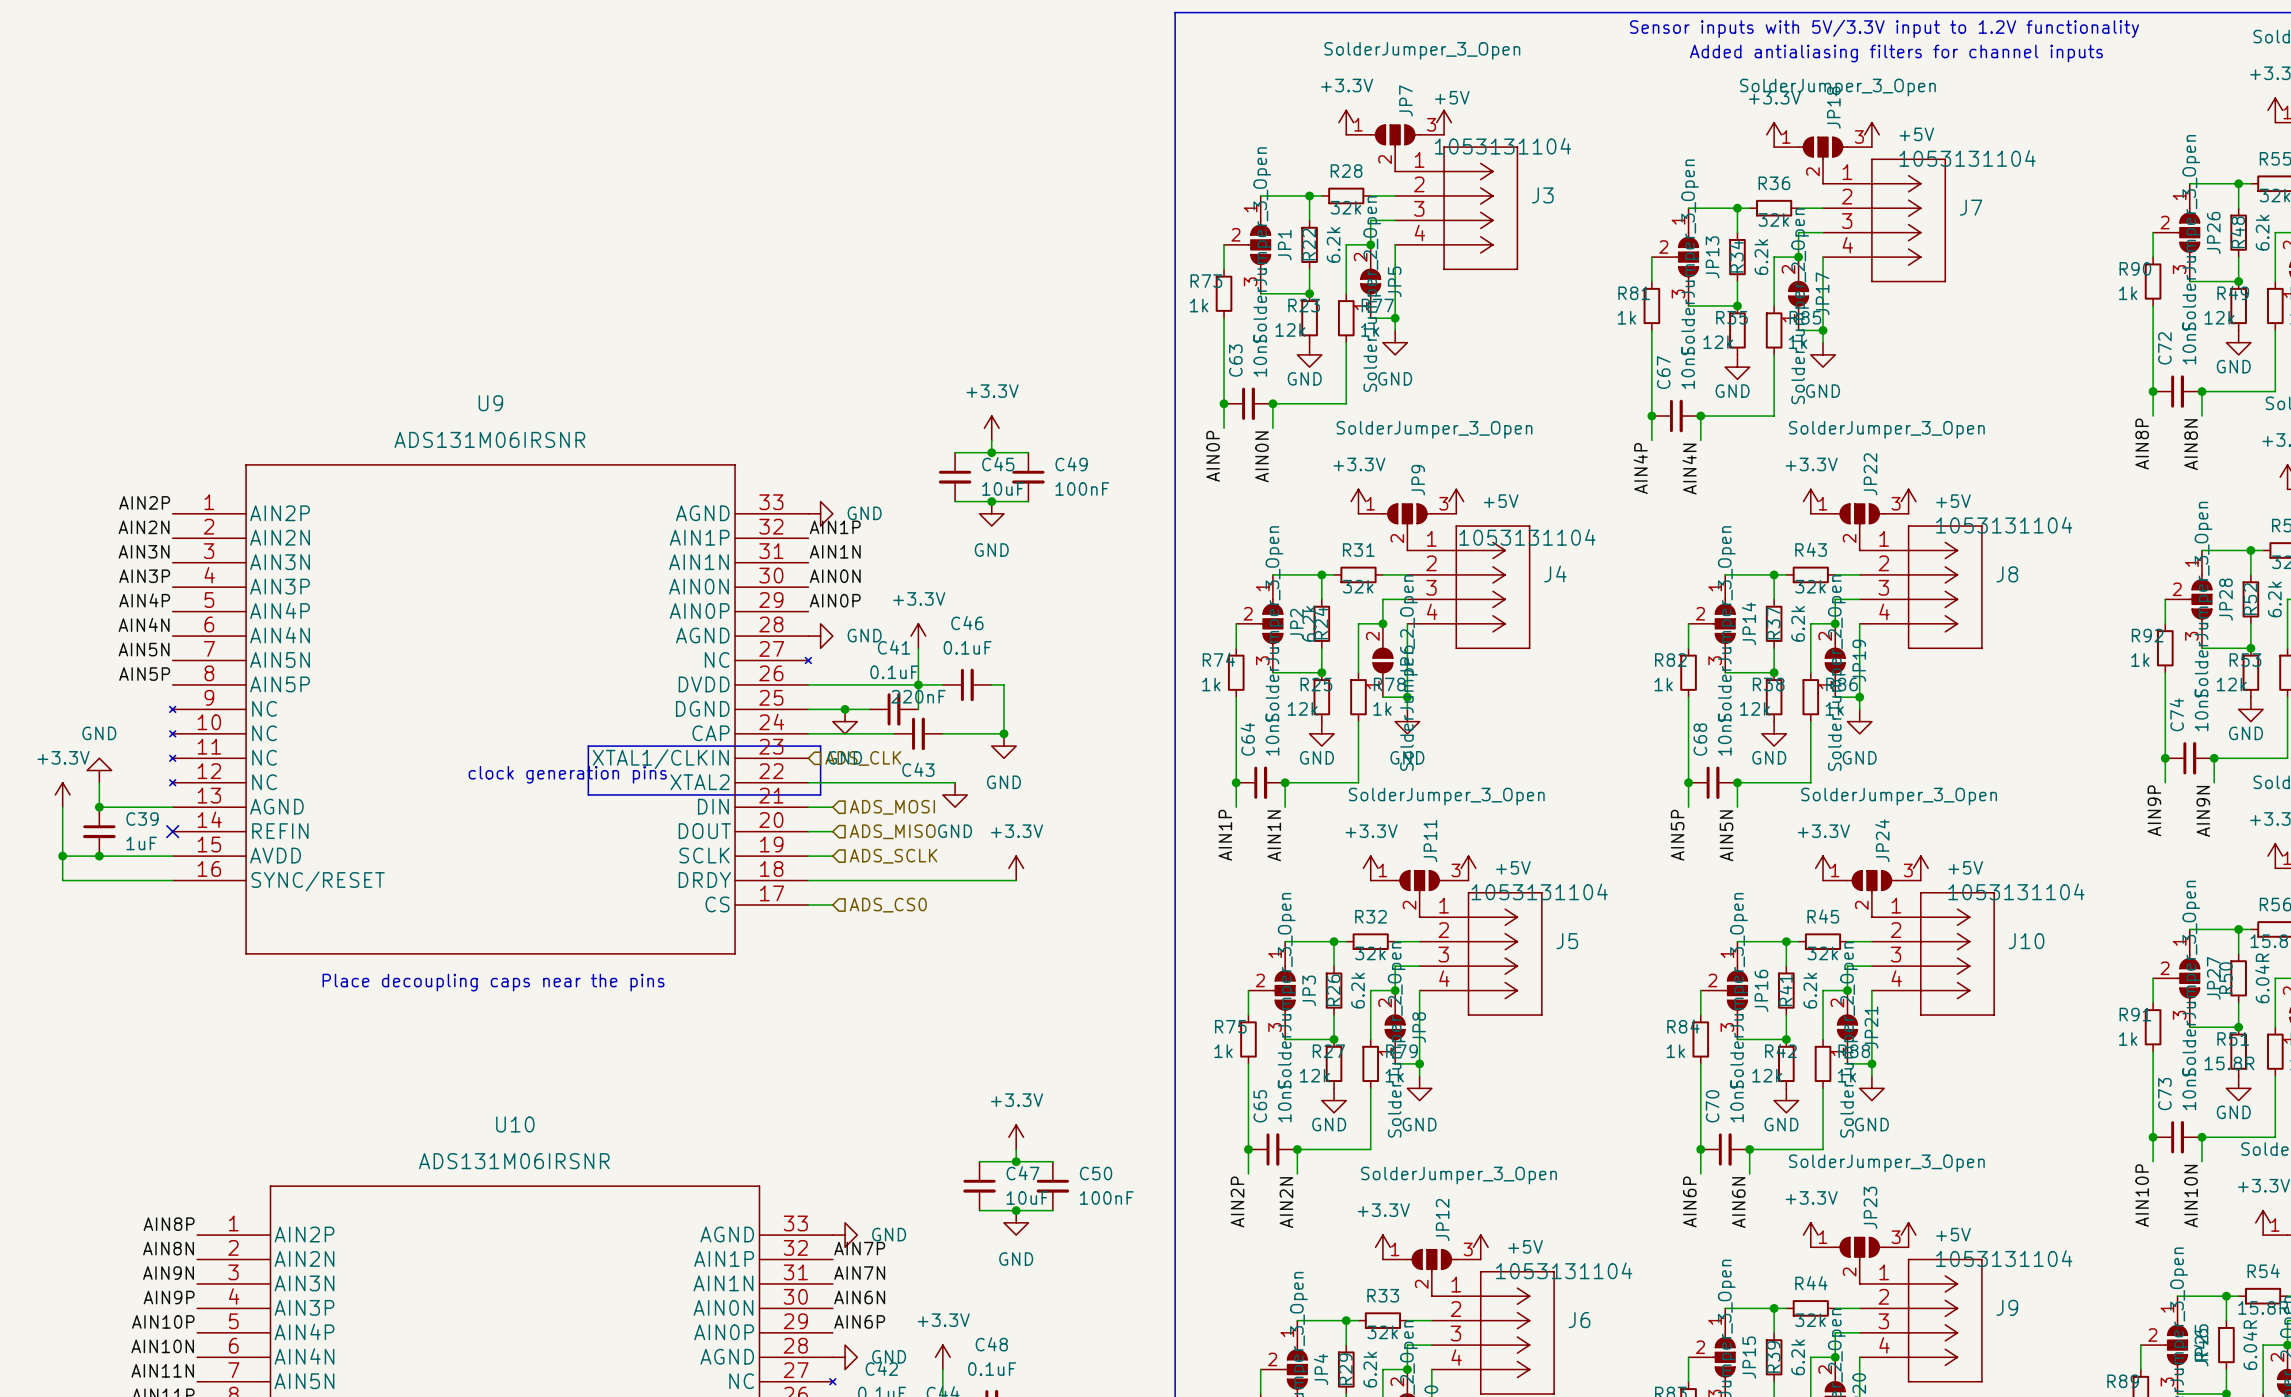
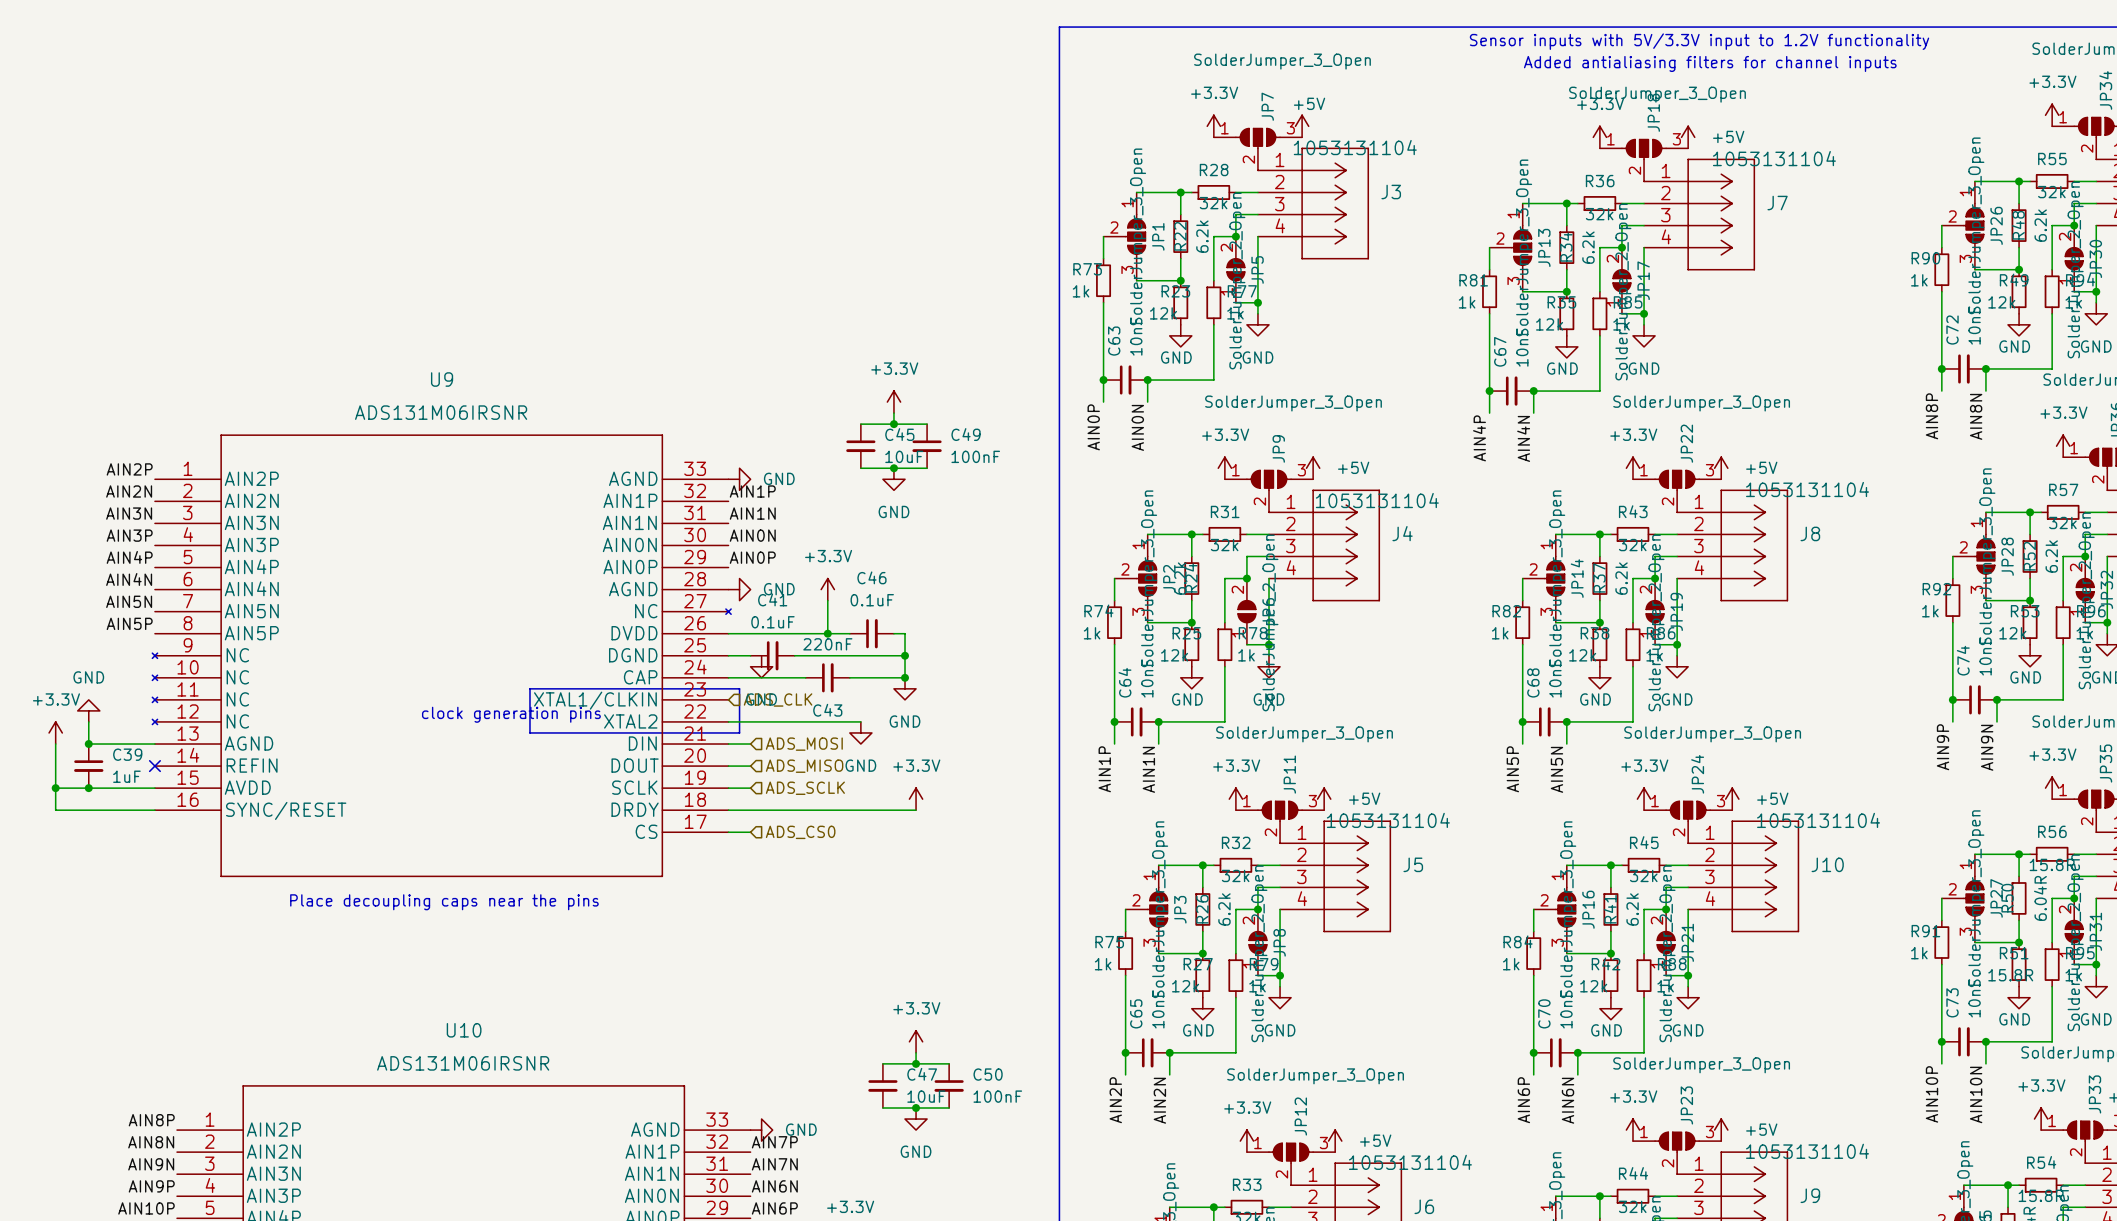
wire: (918, 684) (918, 709) -> none
junction: (845, 709) -> none
wire: none -> (794, 655) (905, 655)
C41 position: (893, 709) -> (772, 655)
junction: none -> (905, 655)

